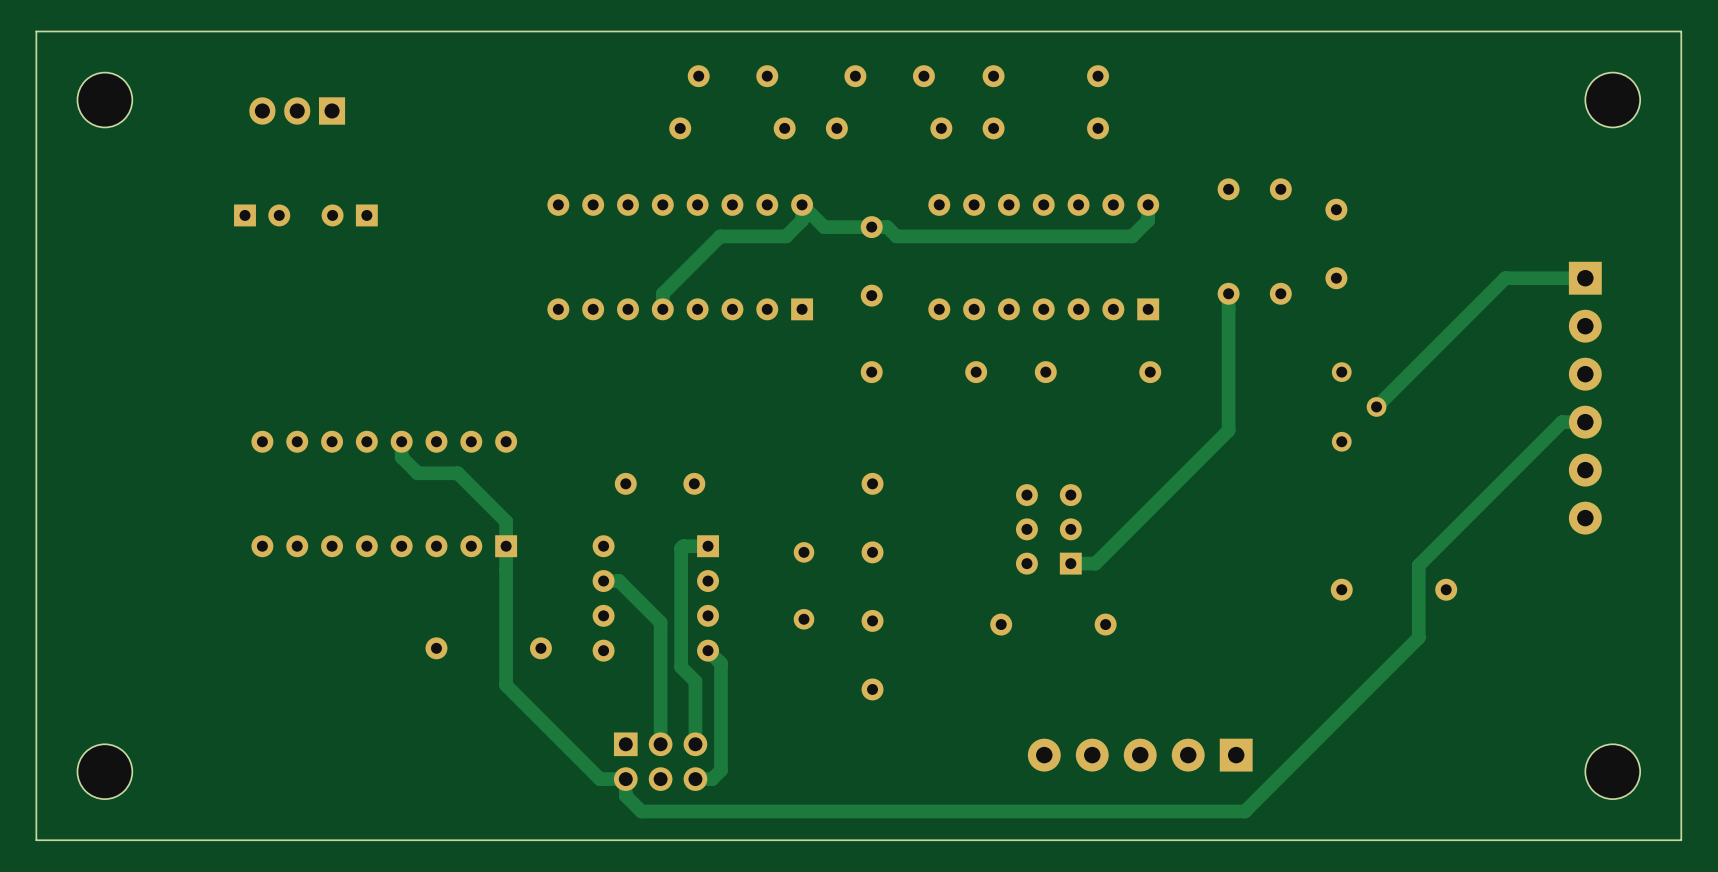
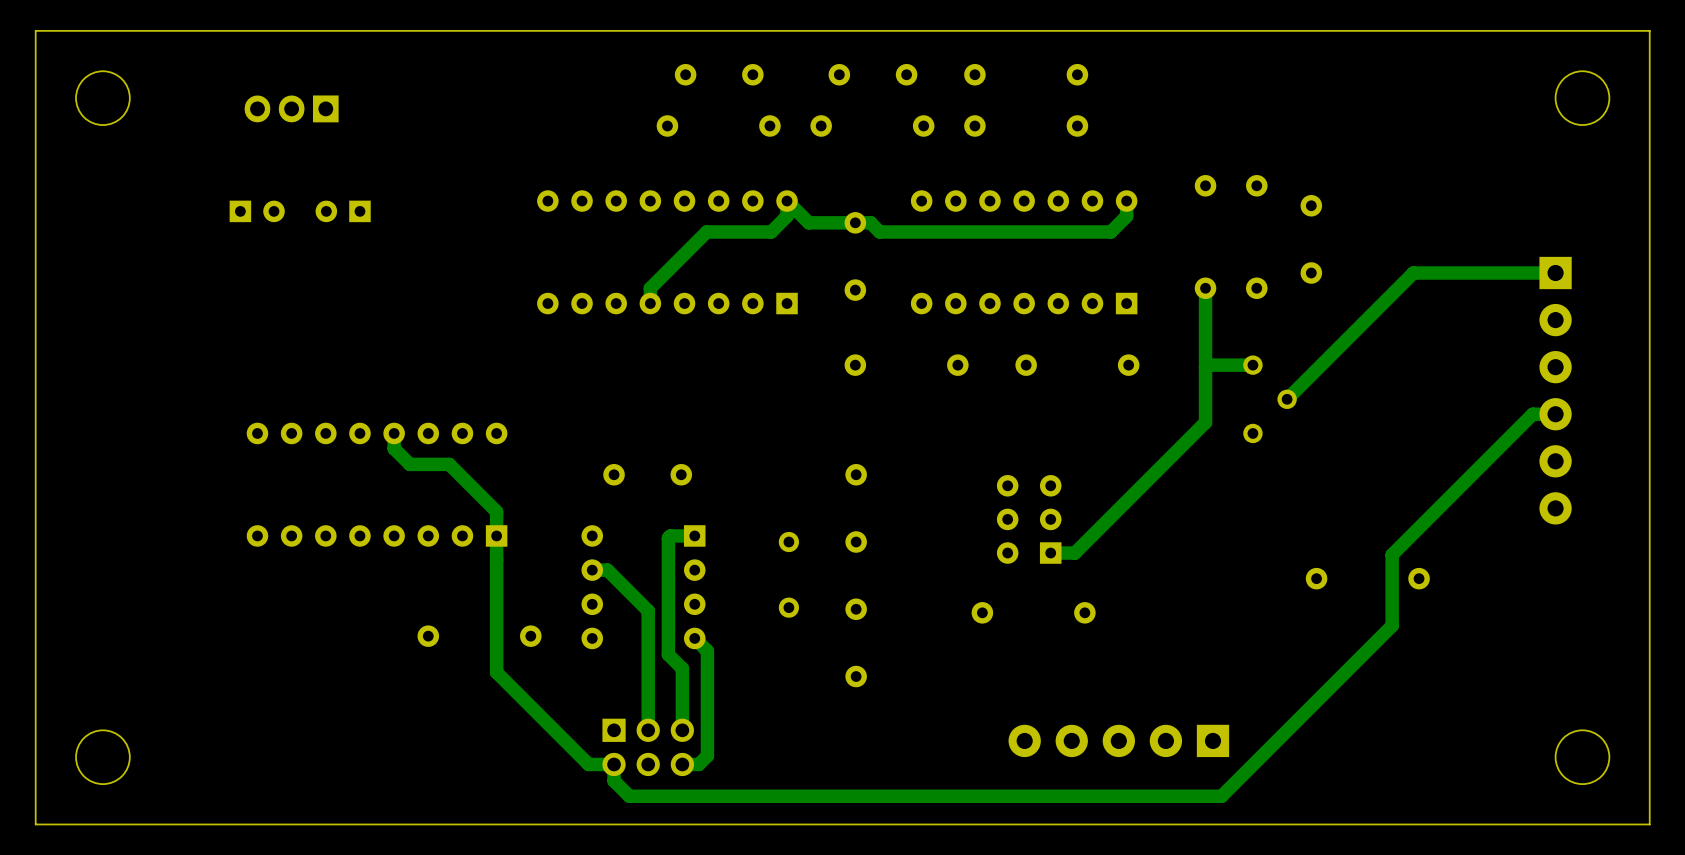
track: (1505, 278) (1376, 406) -> (1477, 273) (1413, 273) (1287, 399)
track: none -> (1252, 365) (1207, 365) (1205, 367)
part position: (1359, 406) -> (1270, 399)

